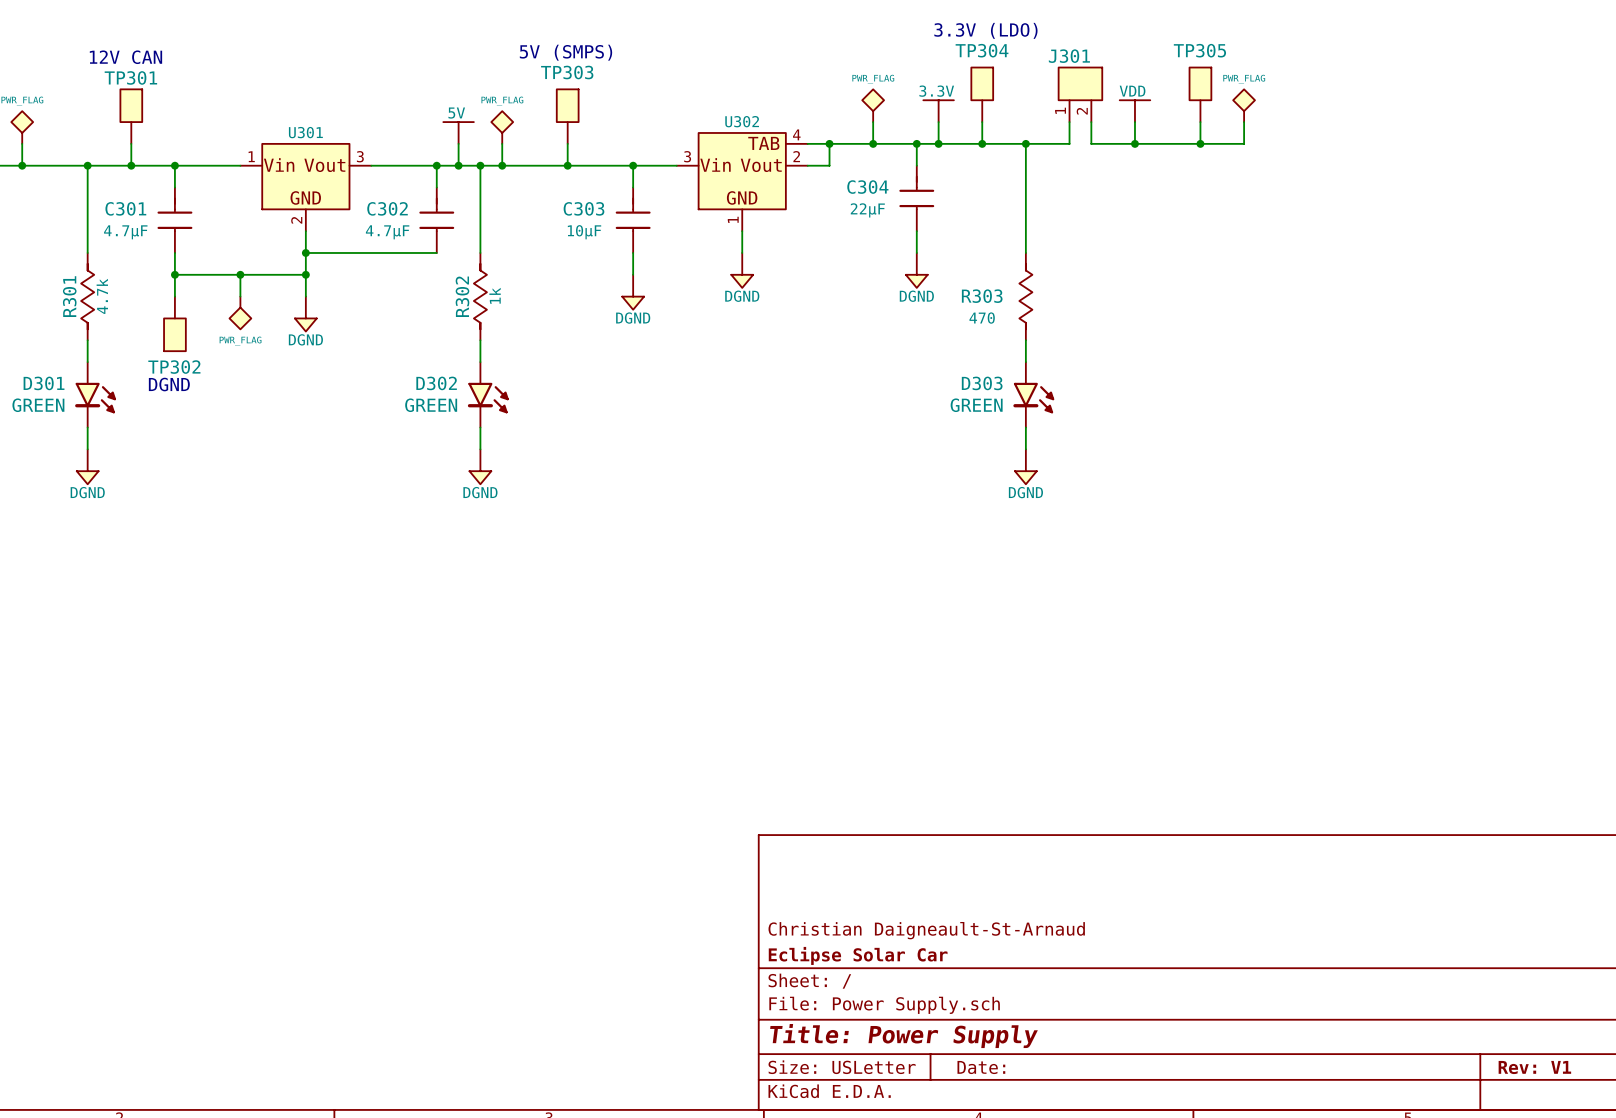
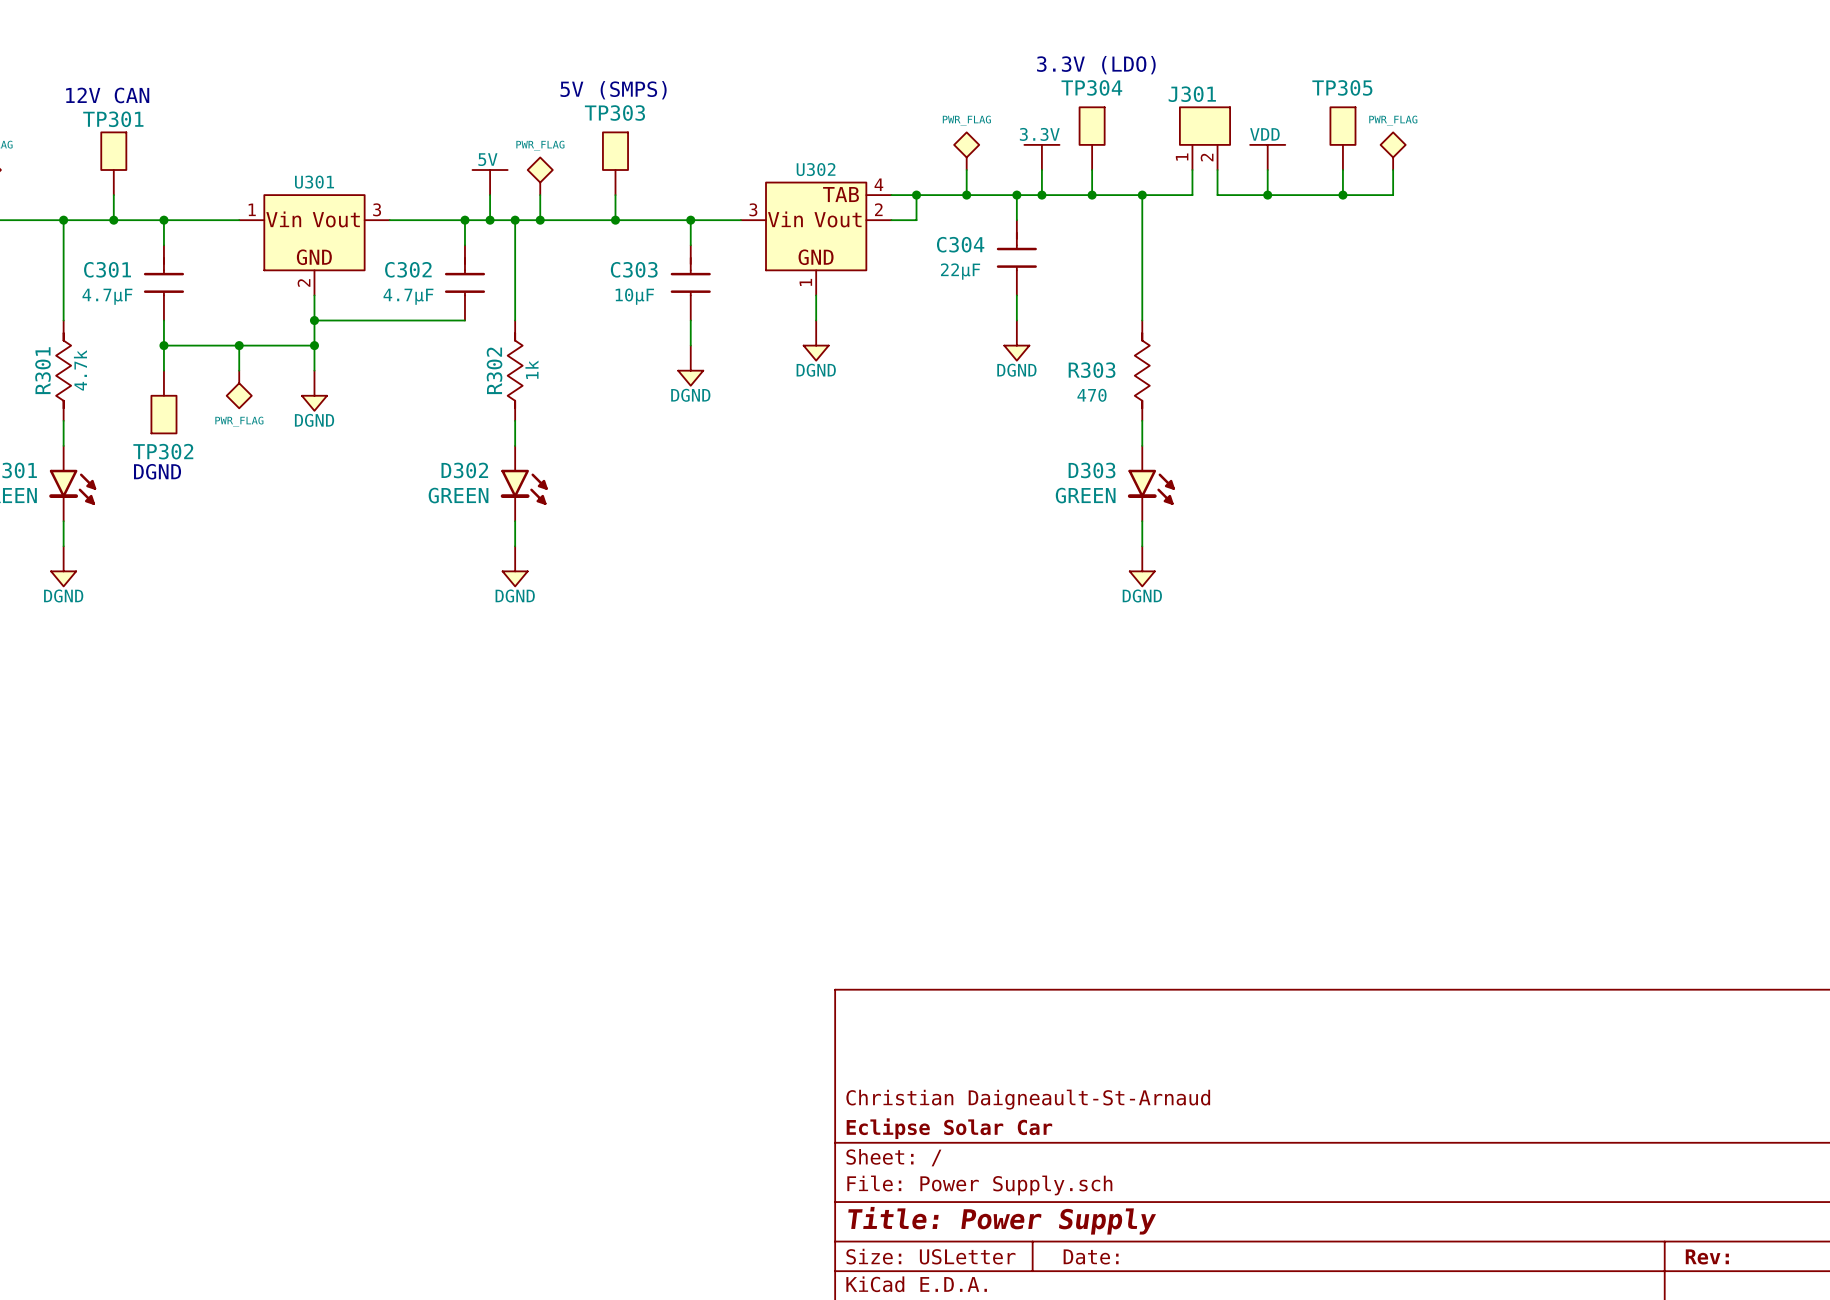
title block: Rev: V1 (1534, 1067) -> Rev: (1707, 1256)

